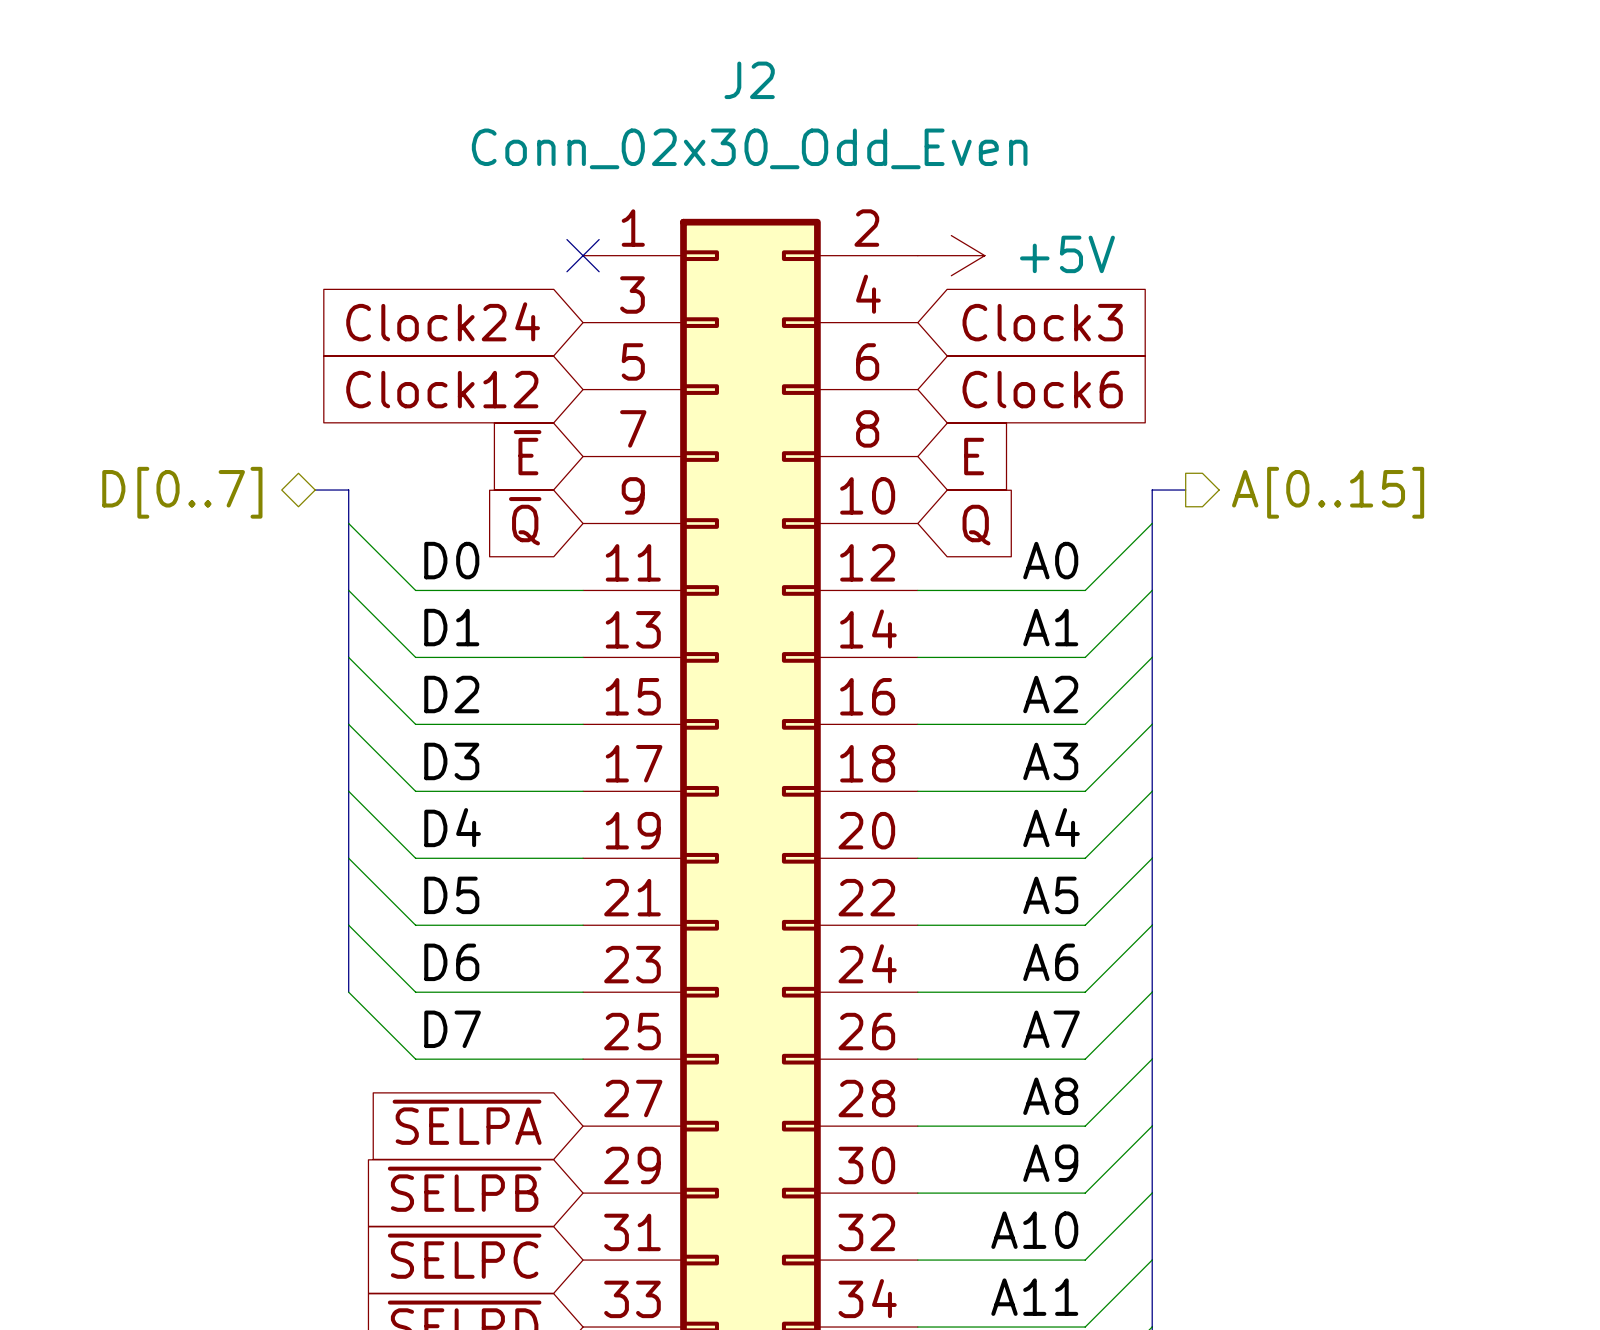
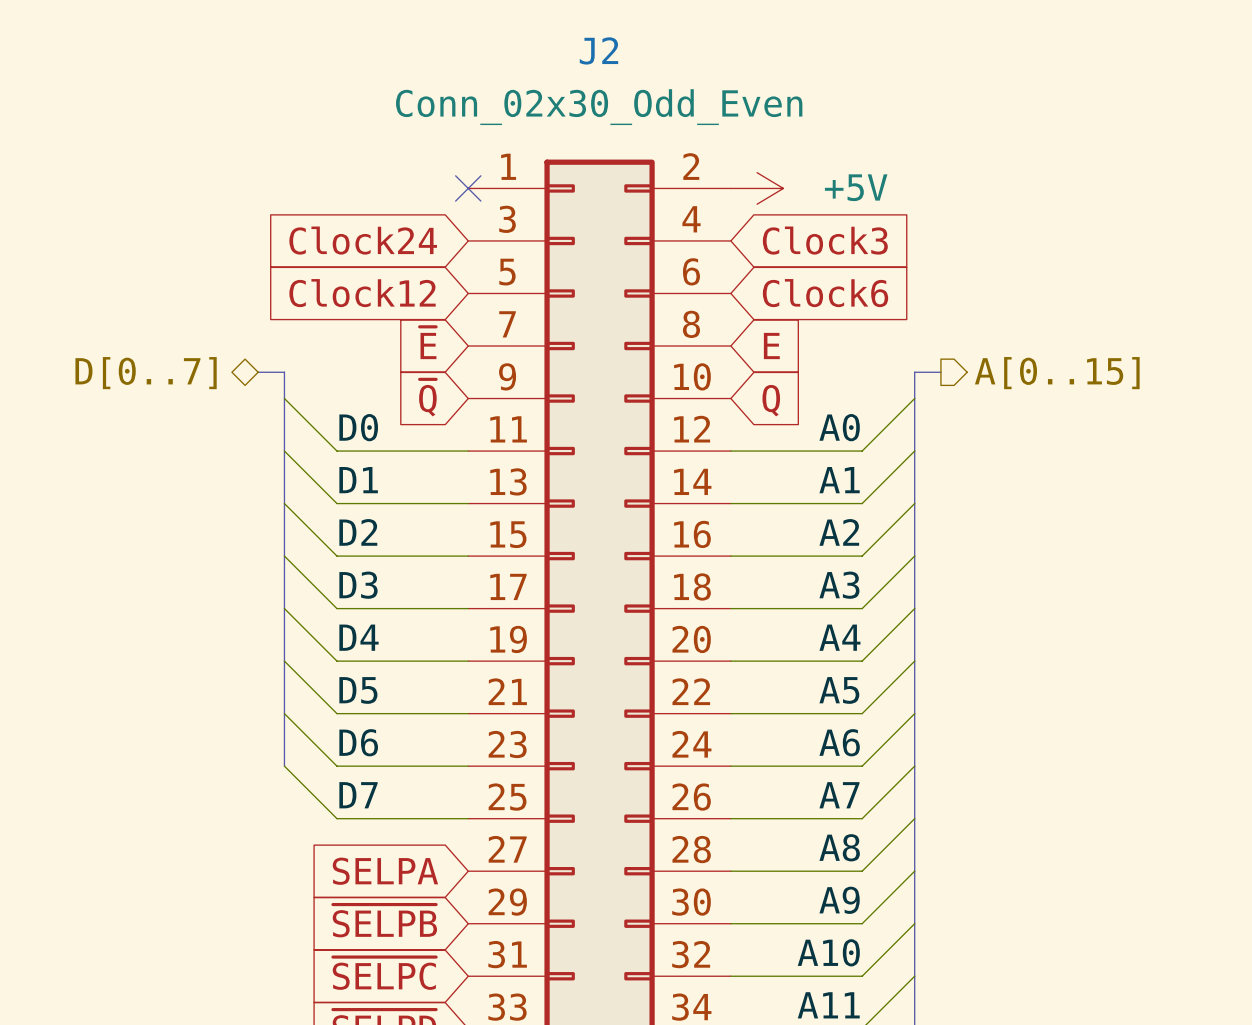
global label: ~{SELPA} (467, 1122) -> SELPA (385, 871)

